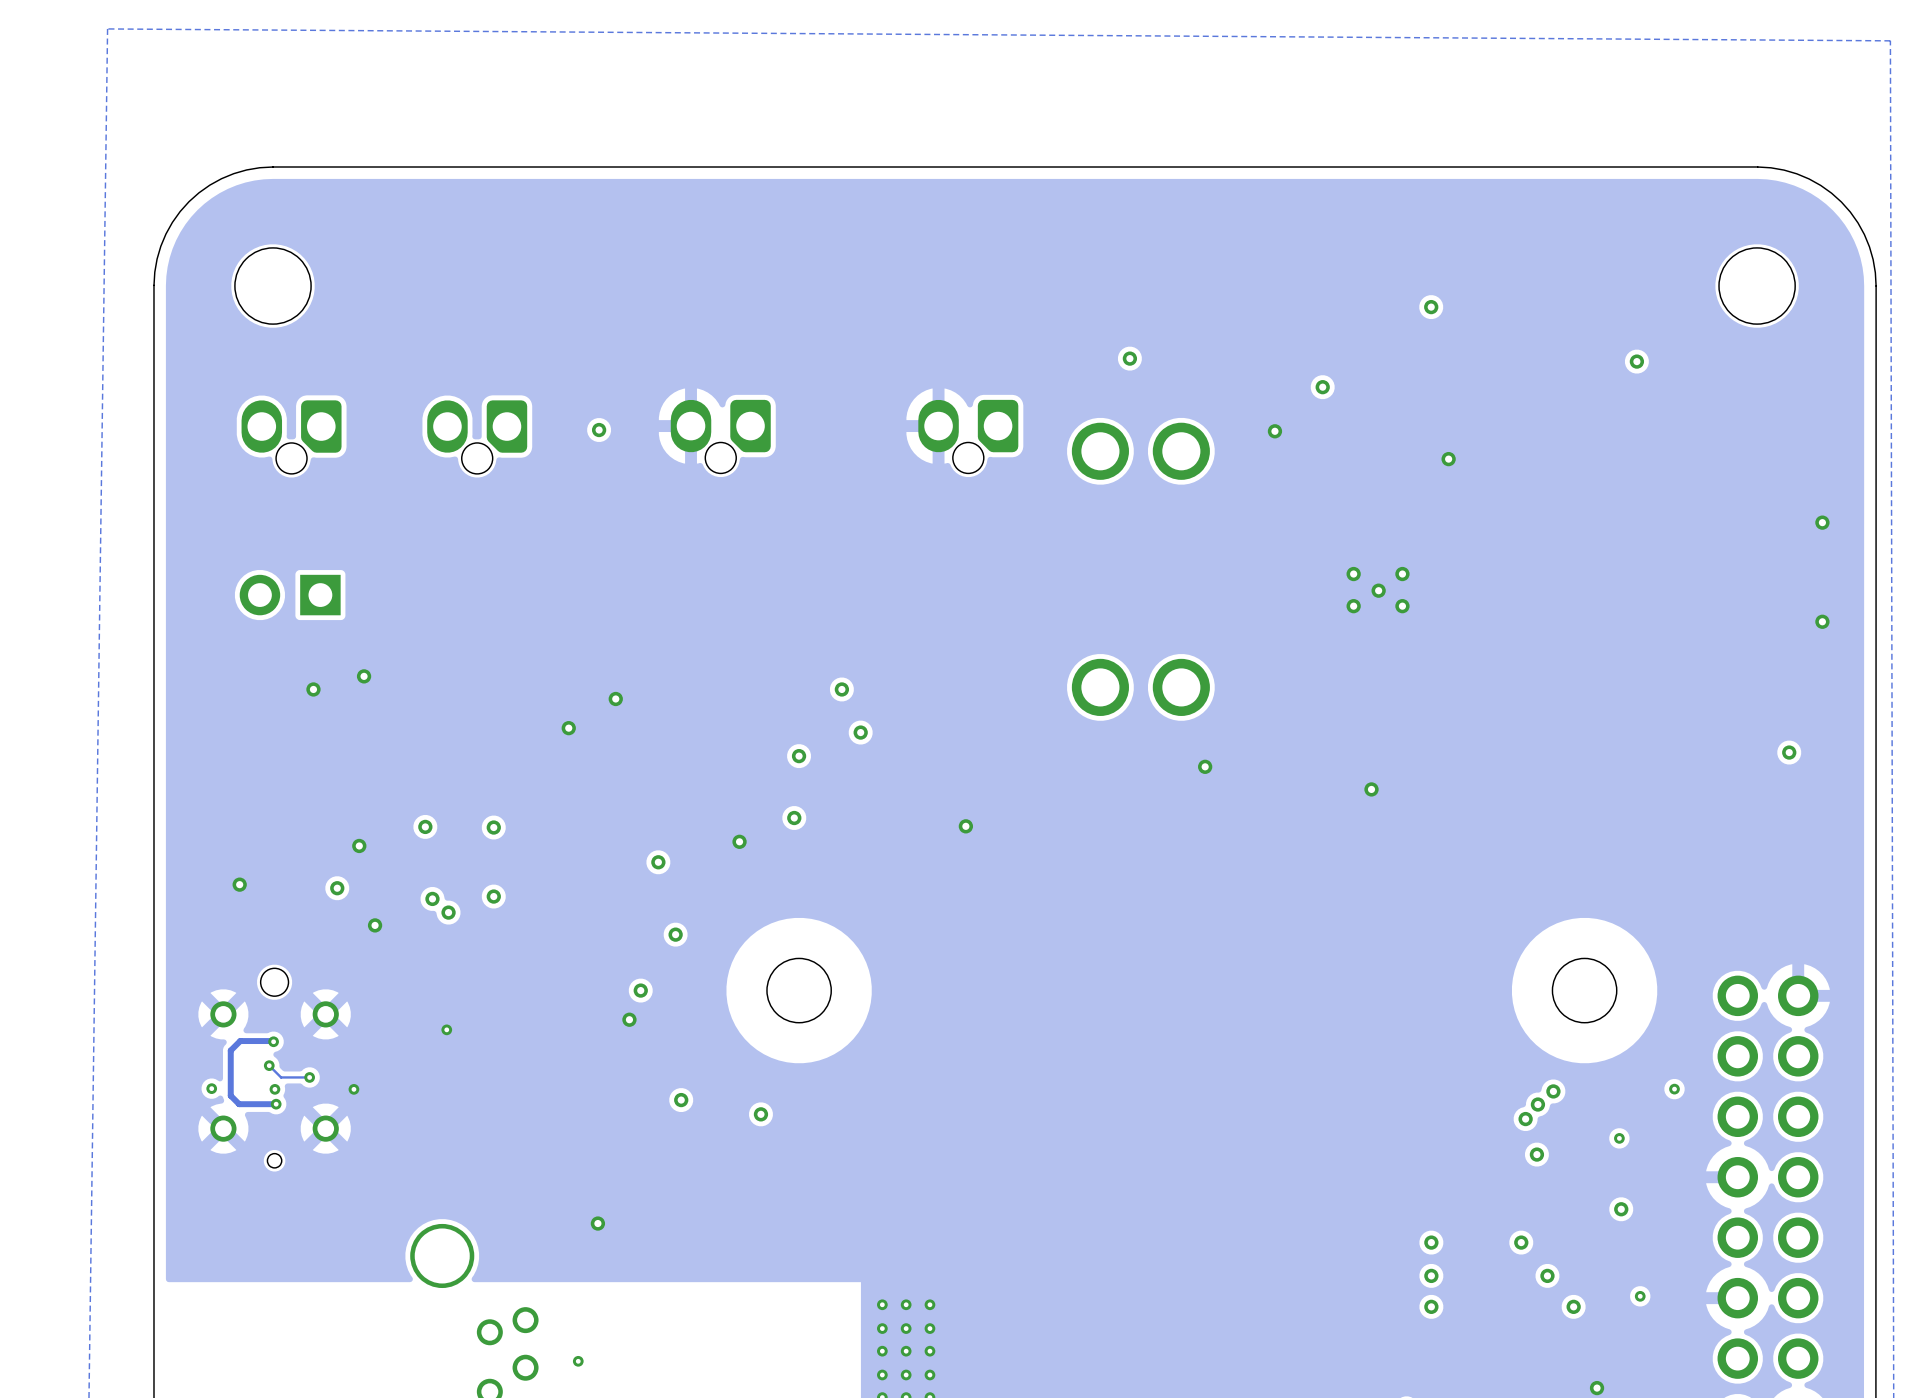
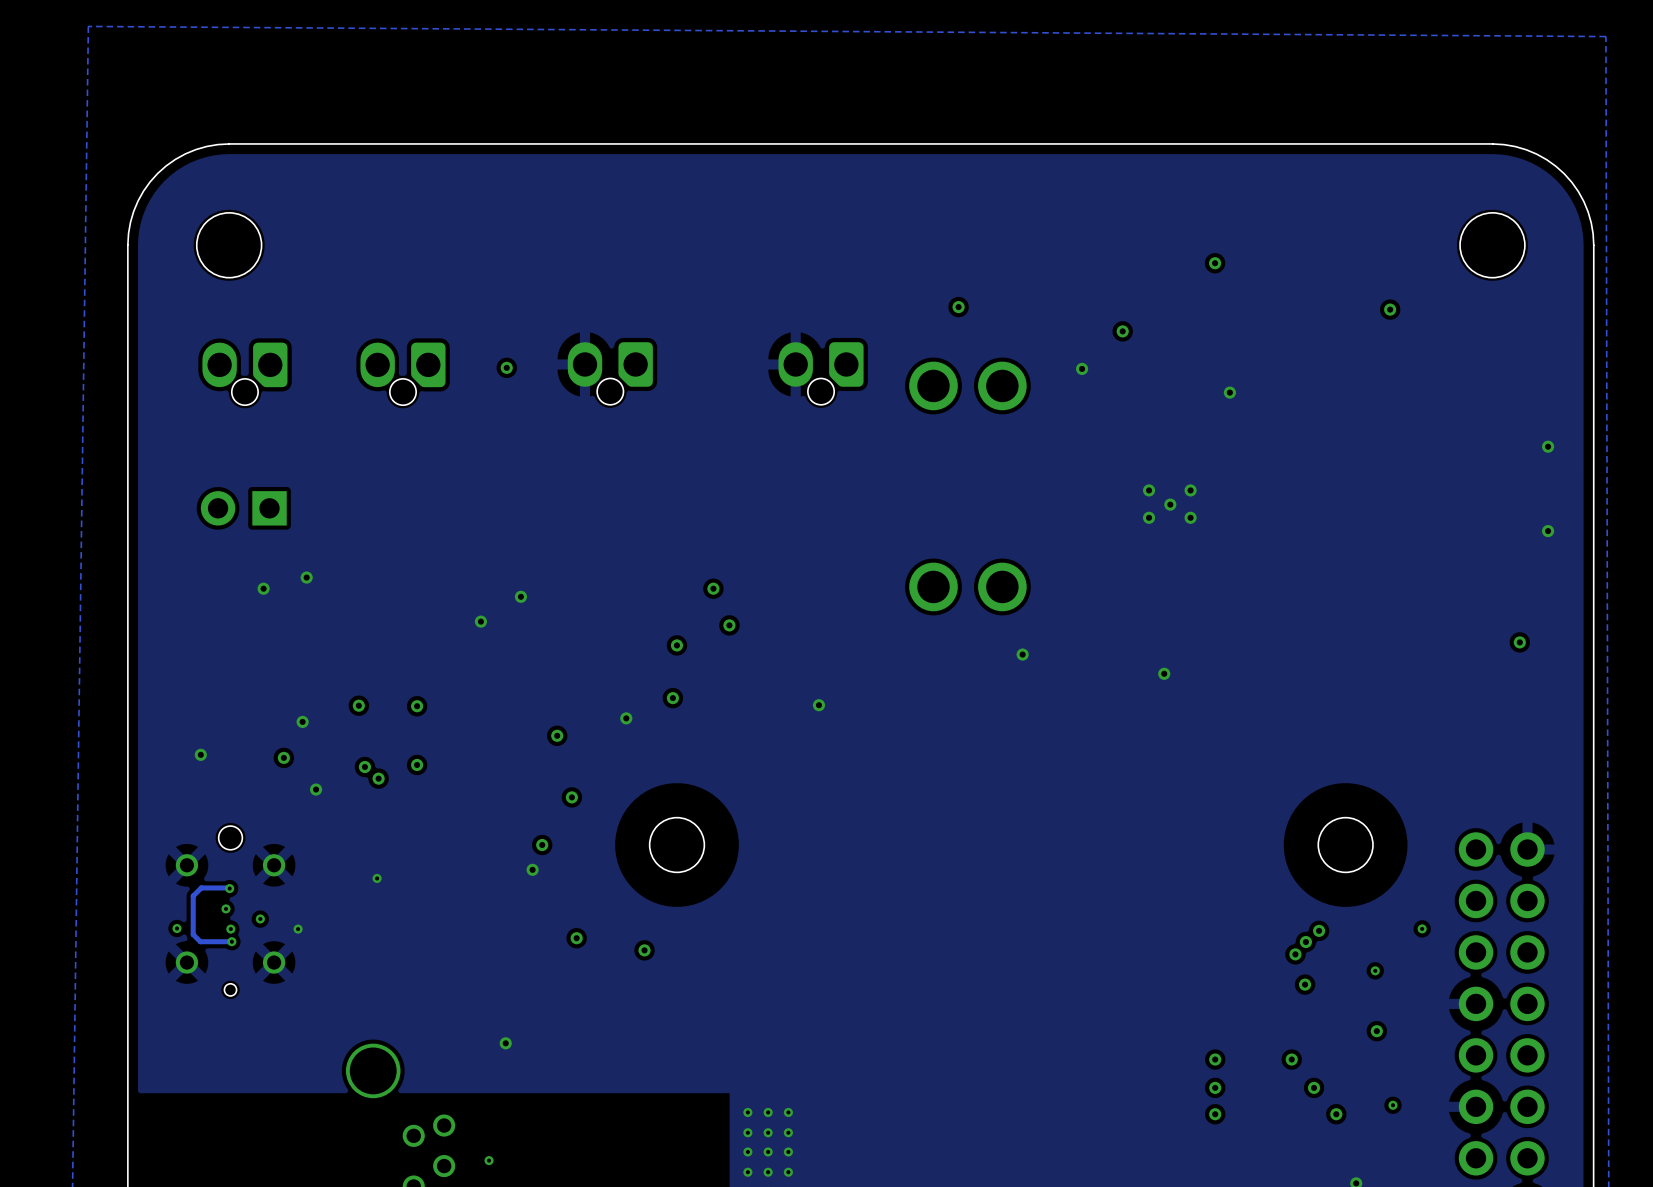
track: (269, 1065) (281, 1077) (309, 1077) -> none

